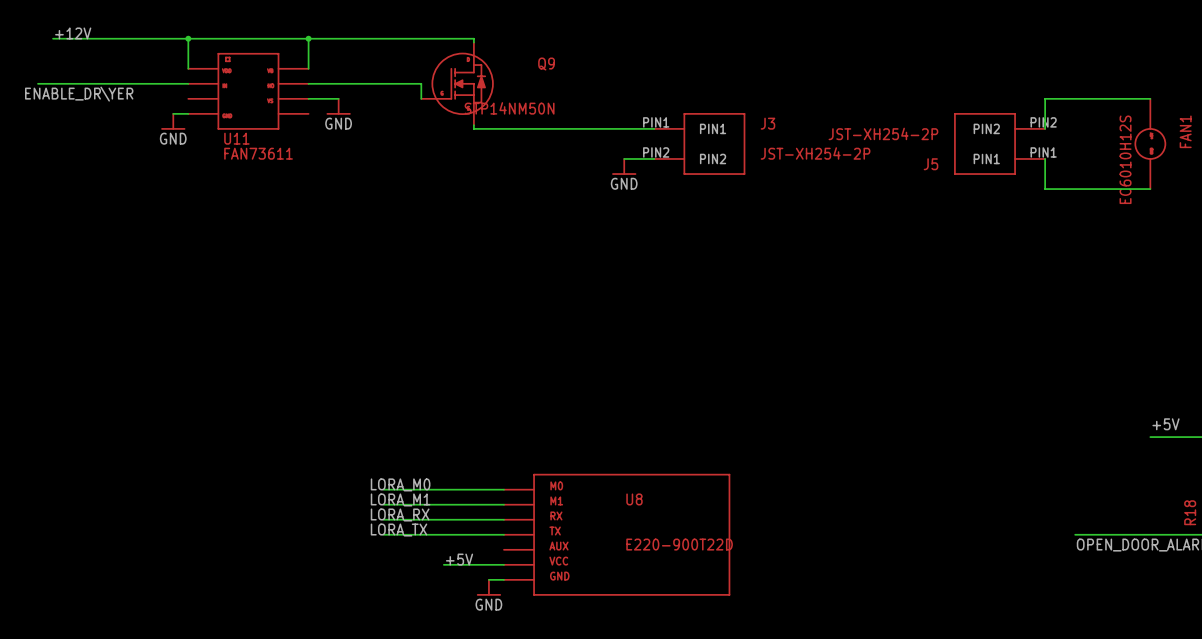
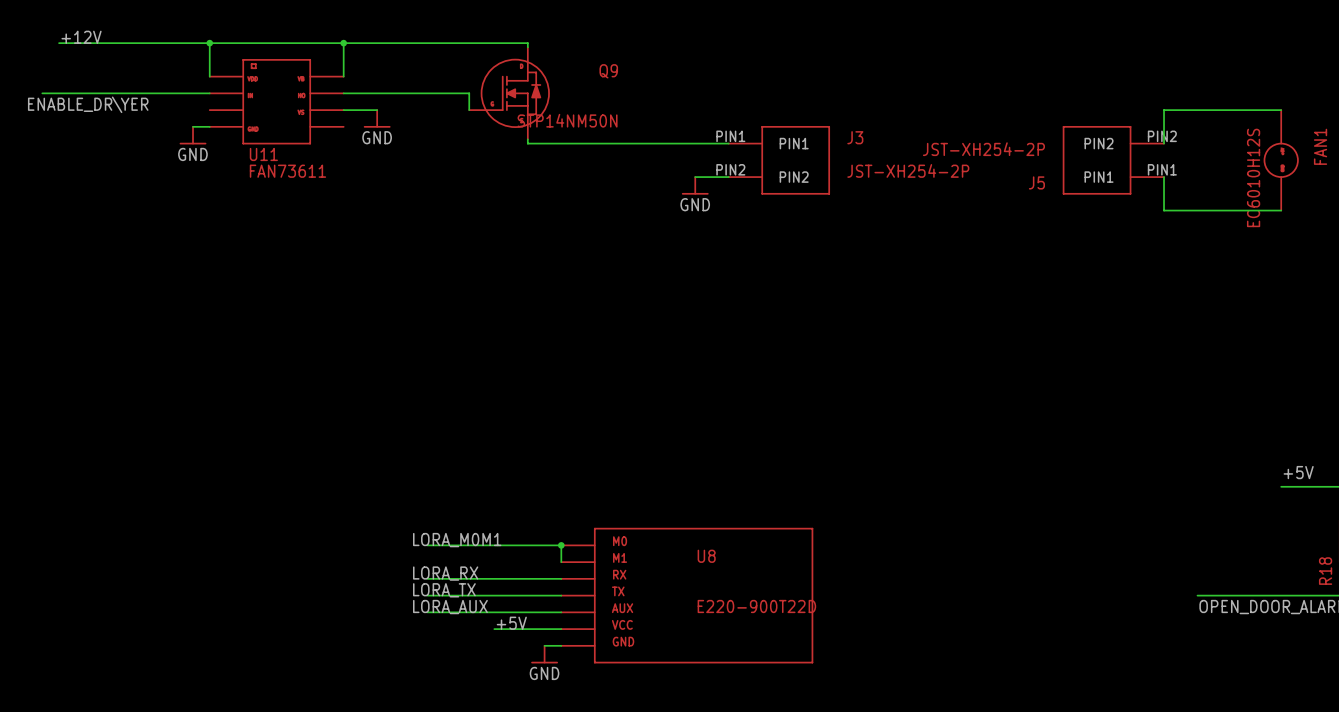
label: LORA_M0 (400, 484) -> LORA_M0M1 (457, 540)
junction: none -> (561, 545)
label: LORA_M1 (400, 499) -> none
wire: (383, 504) (503, 504) -> (561, 545) (561, 562)
label: none -> LORA_AUX (450, 607)
wire: none -> (427, 612) (561, 612)

